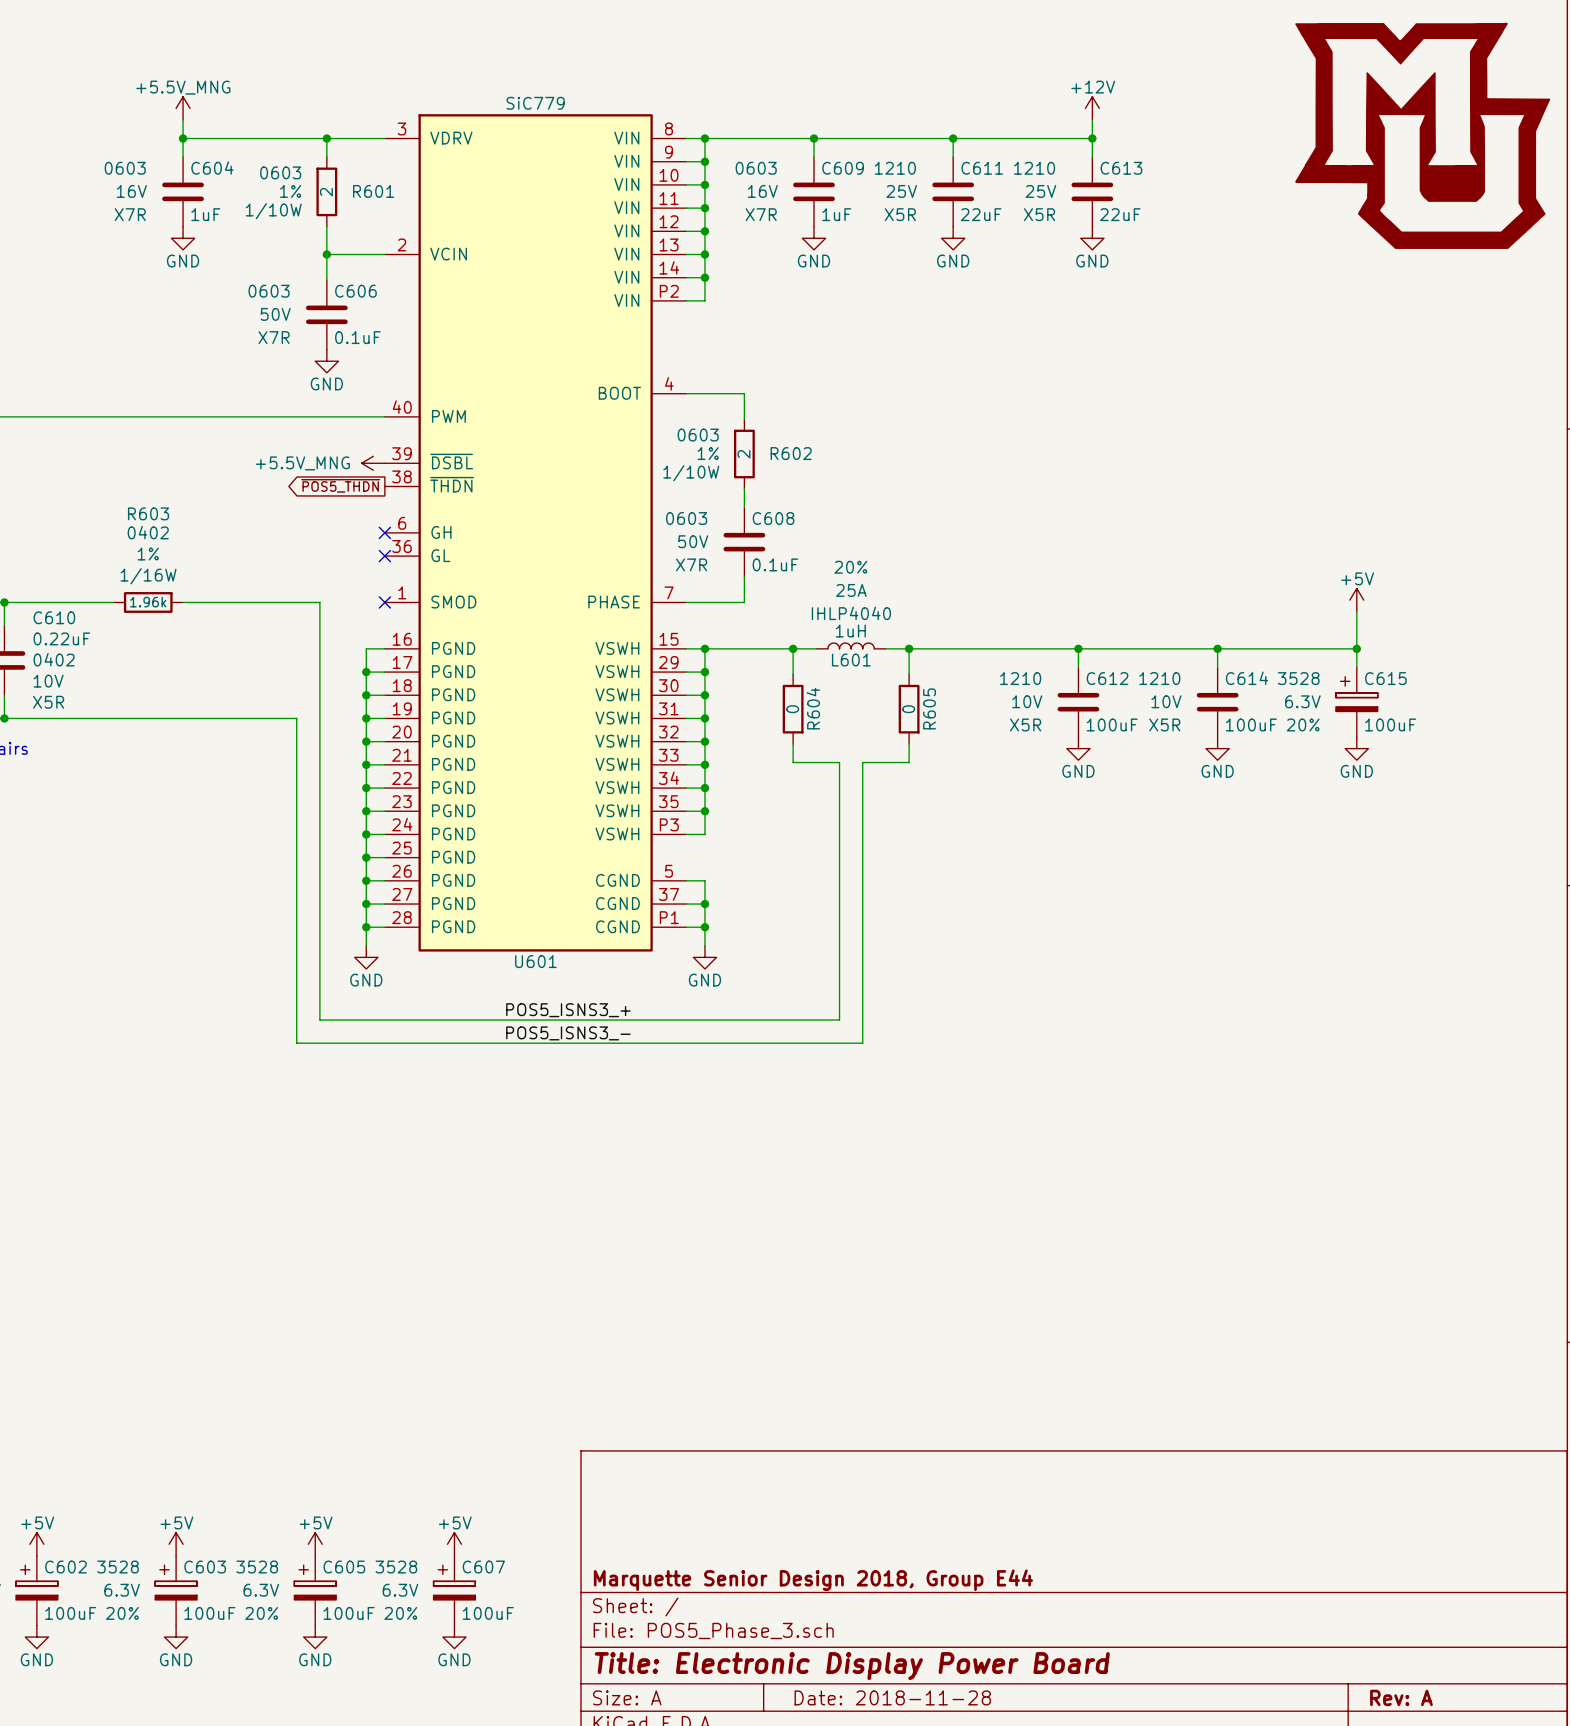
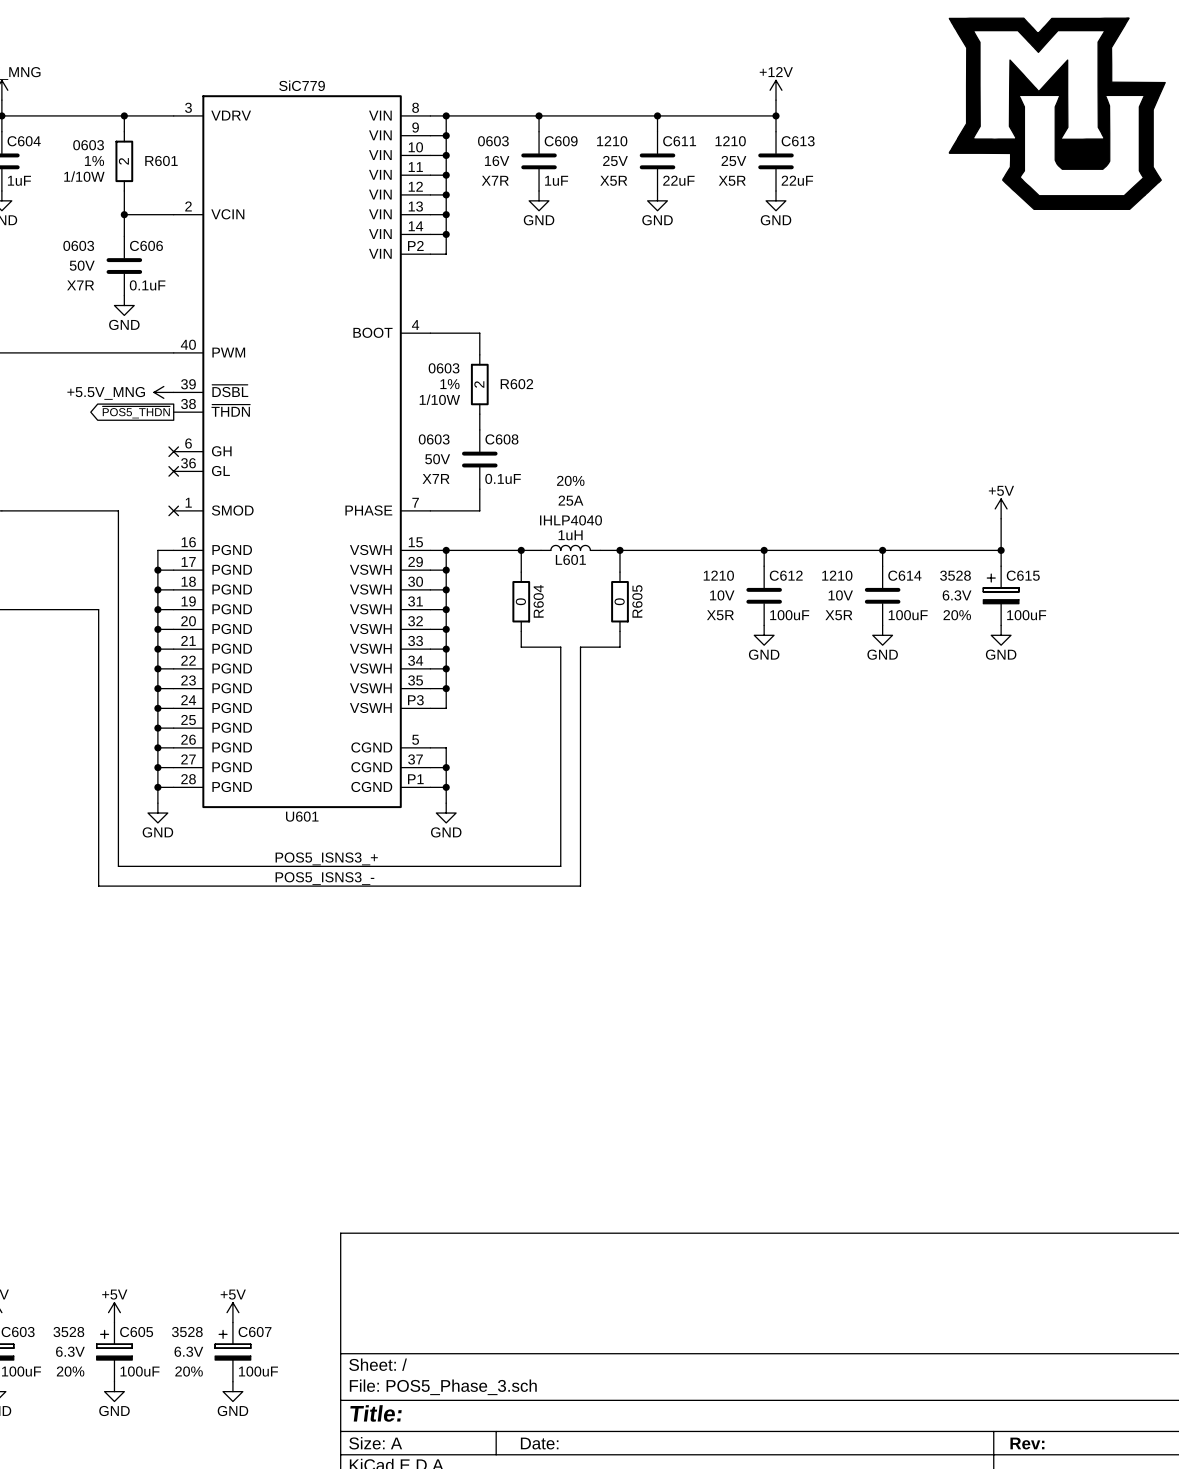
title block: Marquette Senior Design 2018, Group E44 (813, 1580) -> none
title block: Title: Electronic Display Power Board (852, 1666) -> Title: (376, 1413)
title block: Date: 2018-11-28 (892, 1697) -> Date: (539, 1443)
title block: Rev: A (1401, 1697) -> Rev: (1027, 1443)

